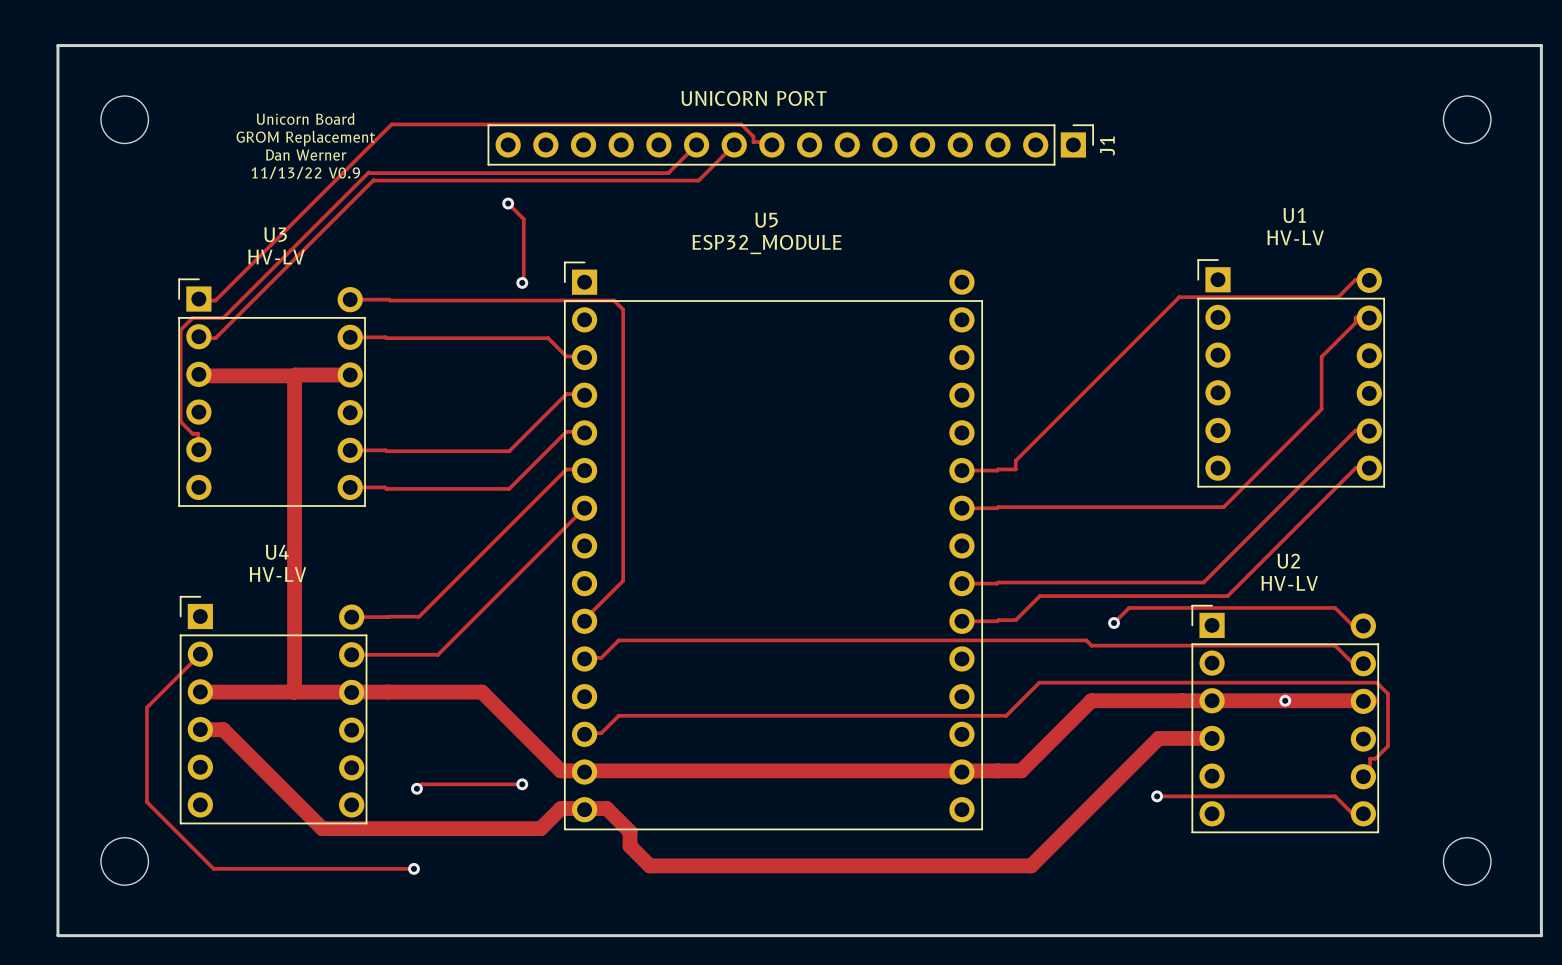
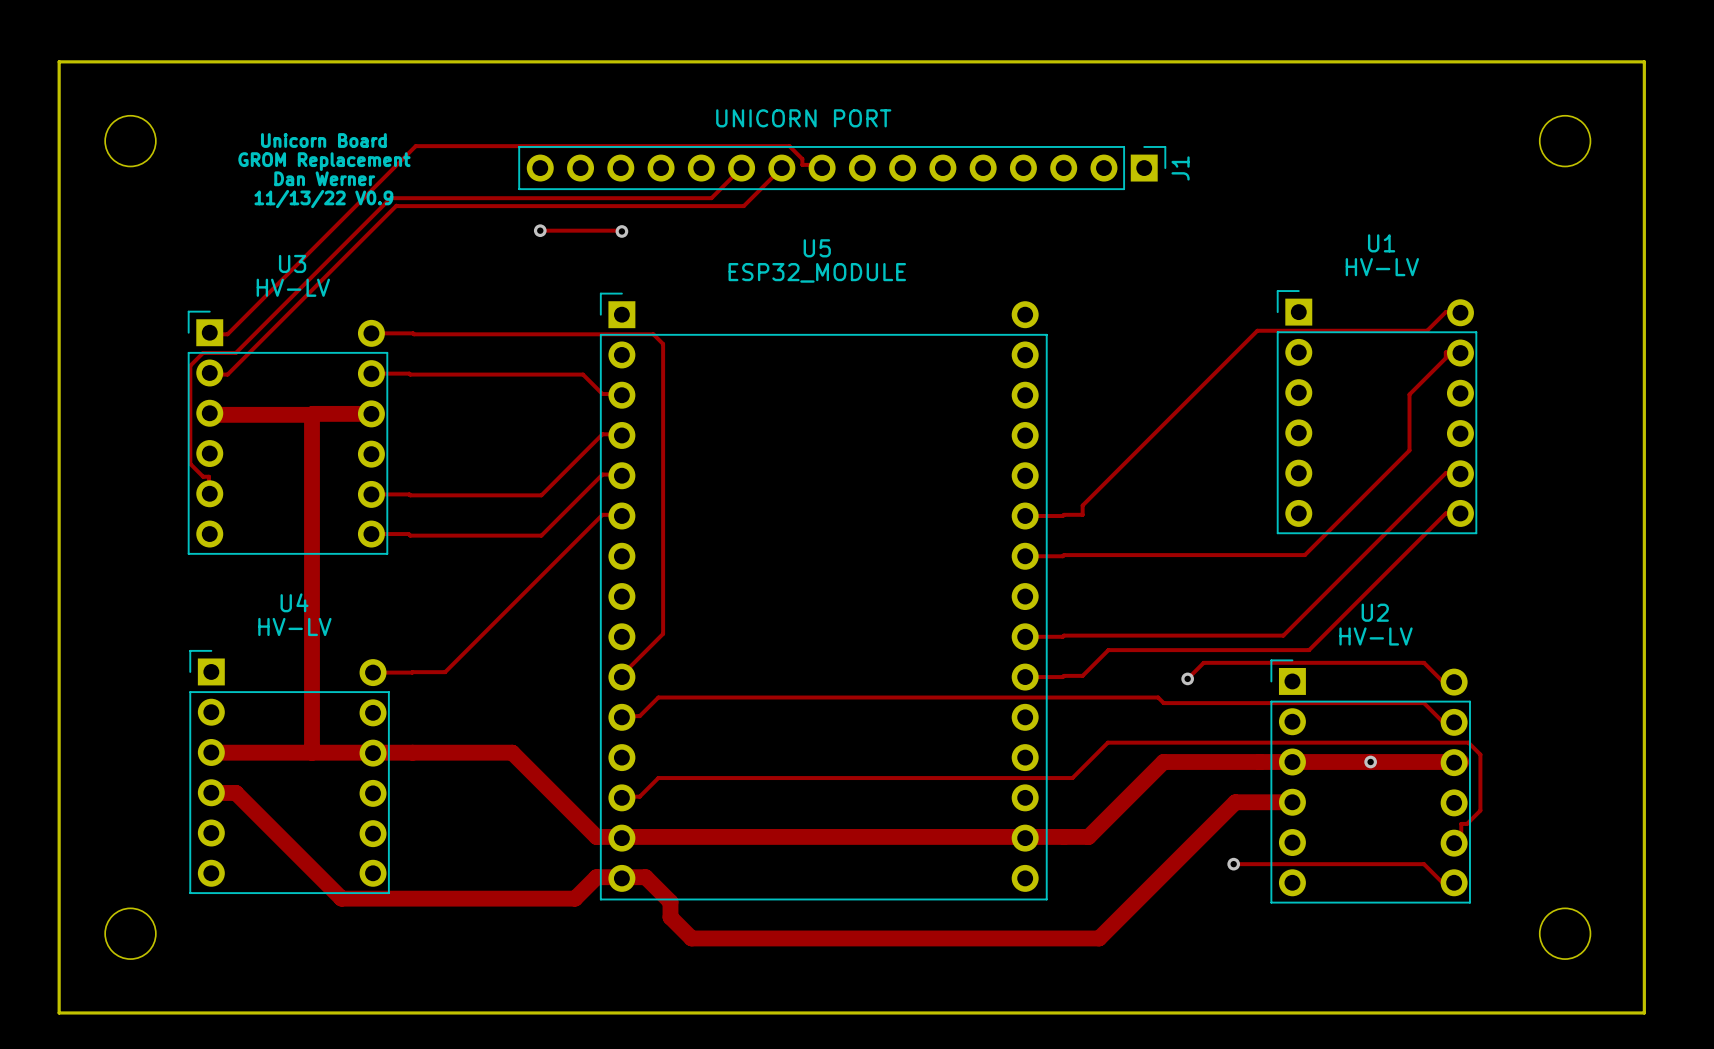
track: (508, 203) (523, 219) (522, 282) -> (540, 230) (621, 231)
via: none -> (621, 231)
via: (522, 282) -> none
track: (584, 508) (438, 654) (351, 654) -> none
track: (200, 654) (146, 707) (146, 802) (213, 868) (413, 868) -> none
track: (522, 784) (421, 784) (416, 788) -> none
via: (522, 784) -> none
via: (416, 788) -> none
via: (413, 868) -> none

